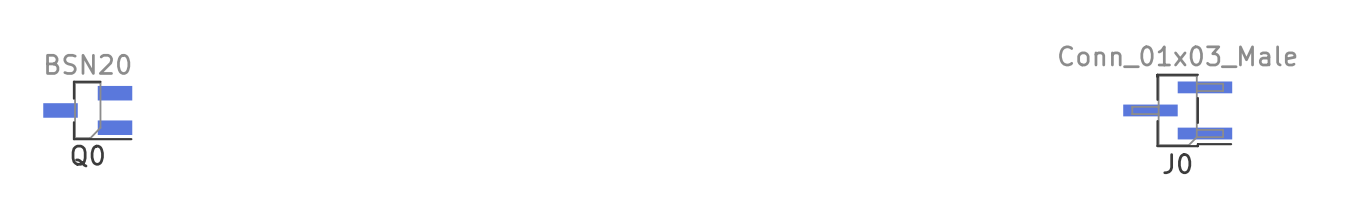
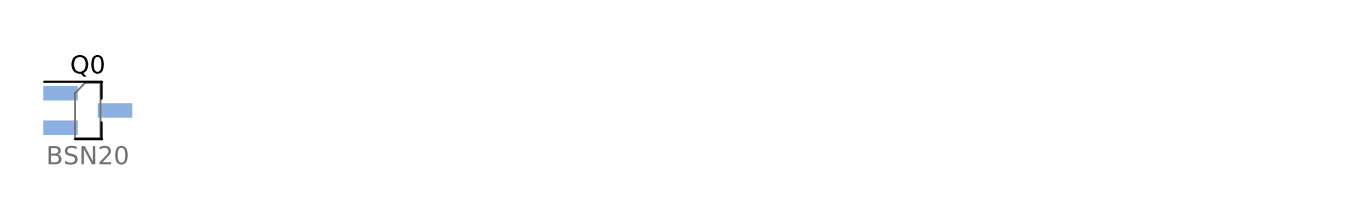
Q0 rotation: 0° (87, 110) -> 180° (87, 110)
J0: Conn_01x03_Male (1177, 110) -> none

